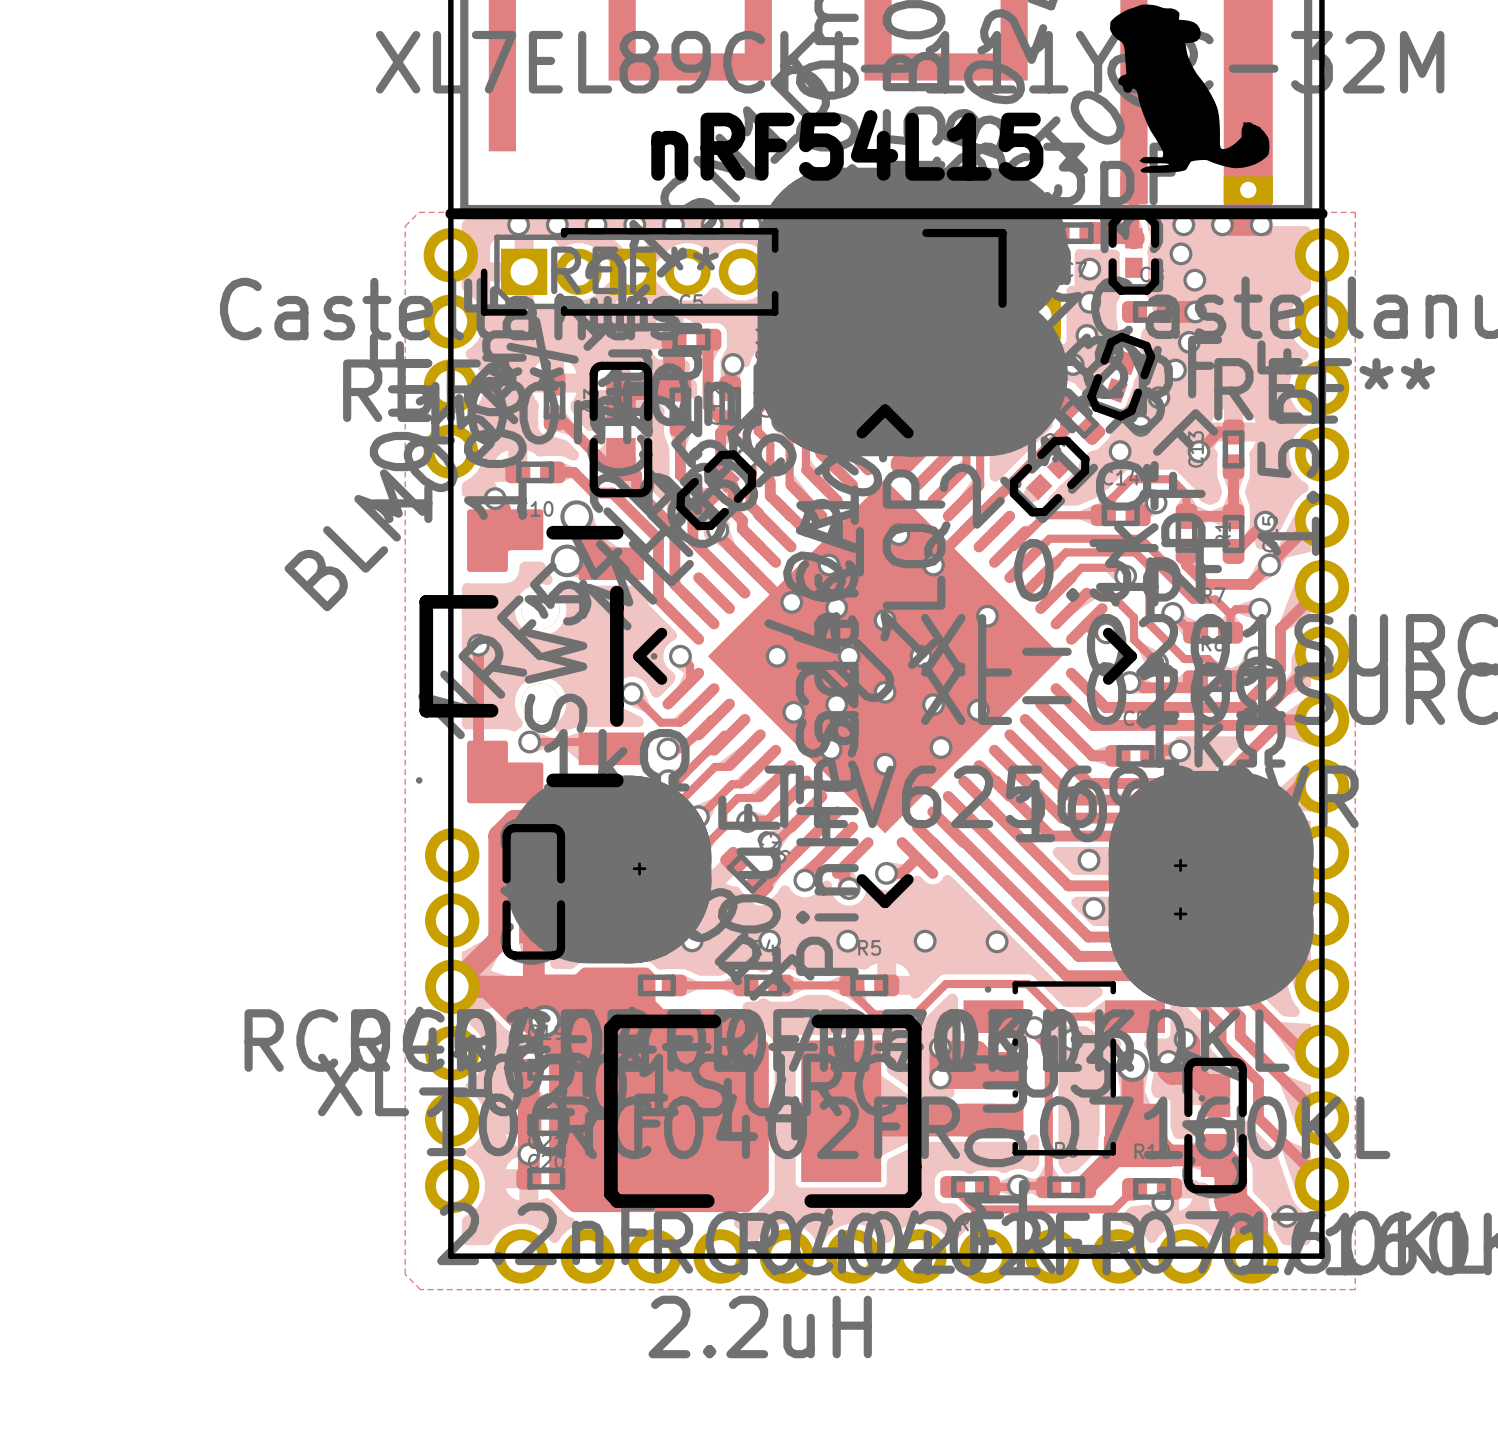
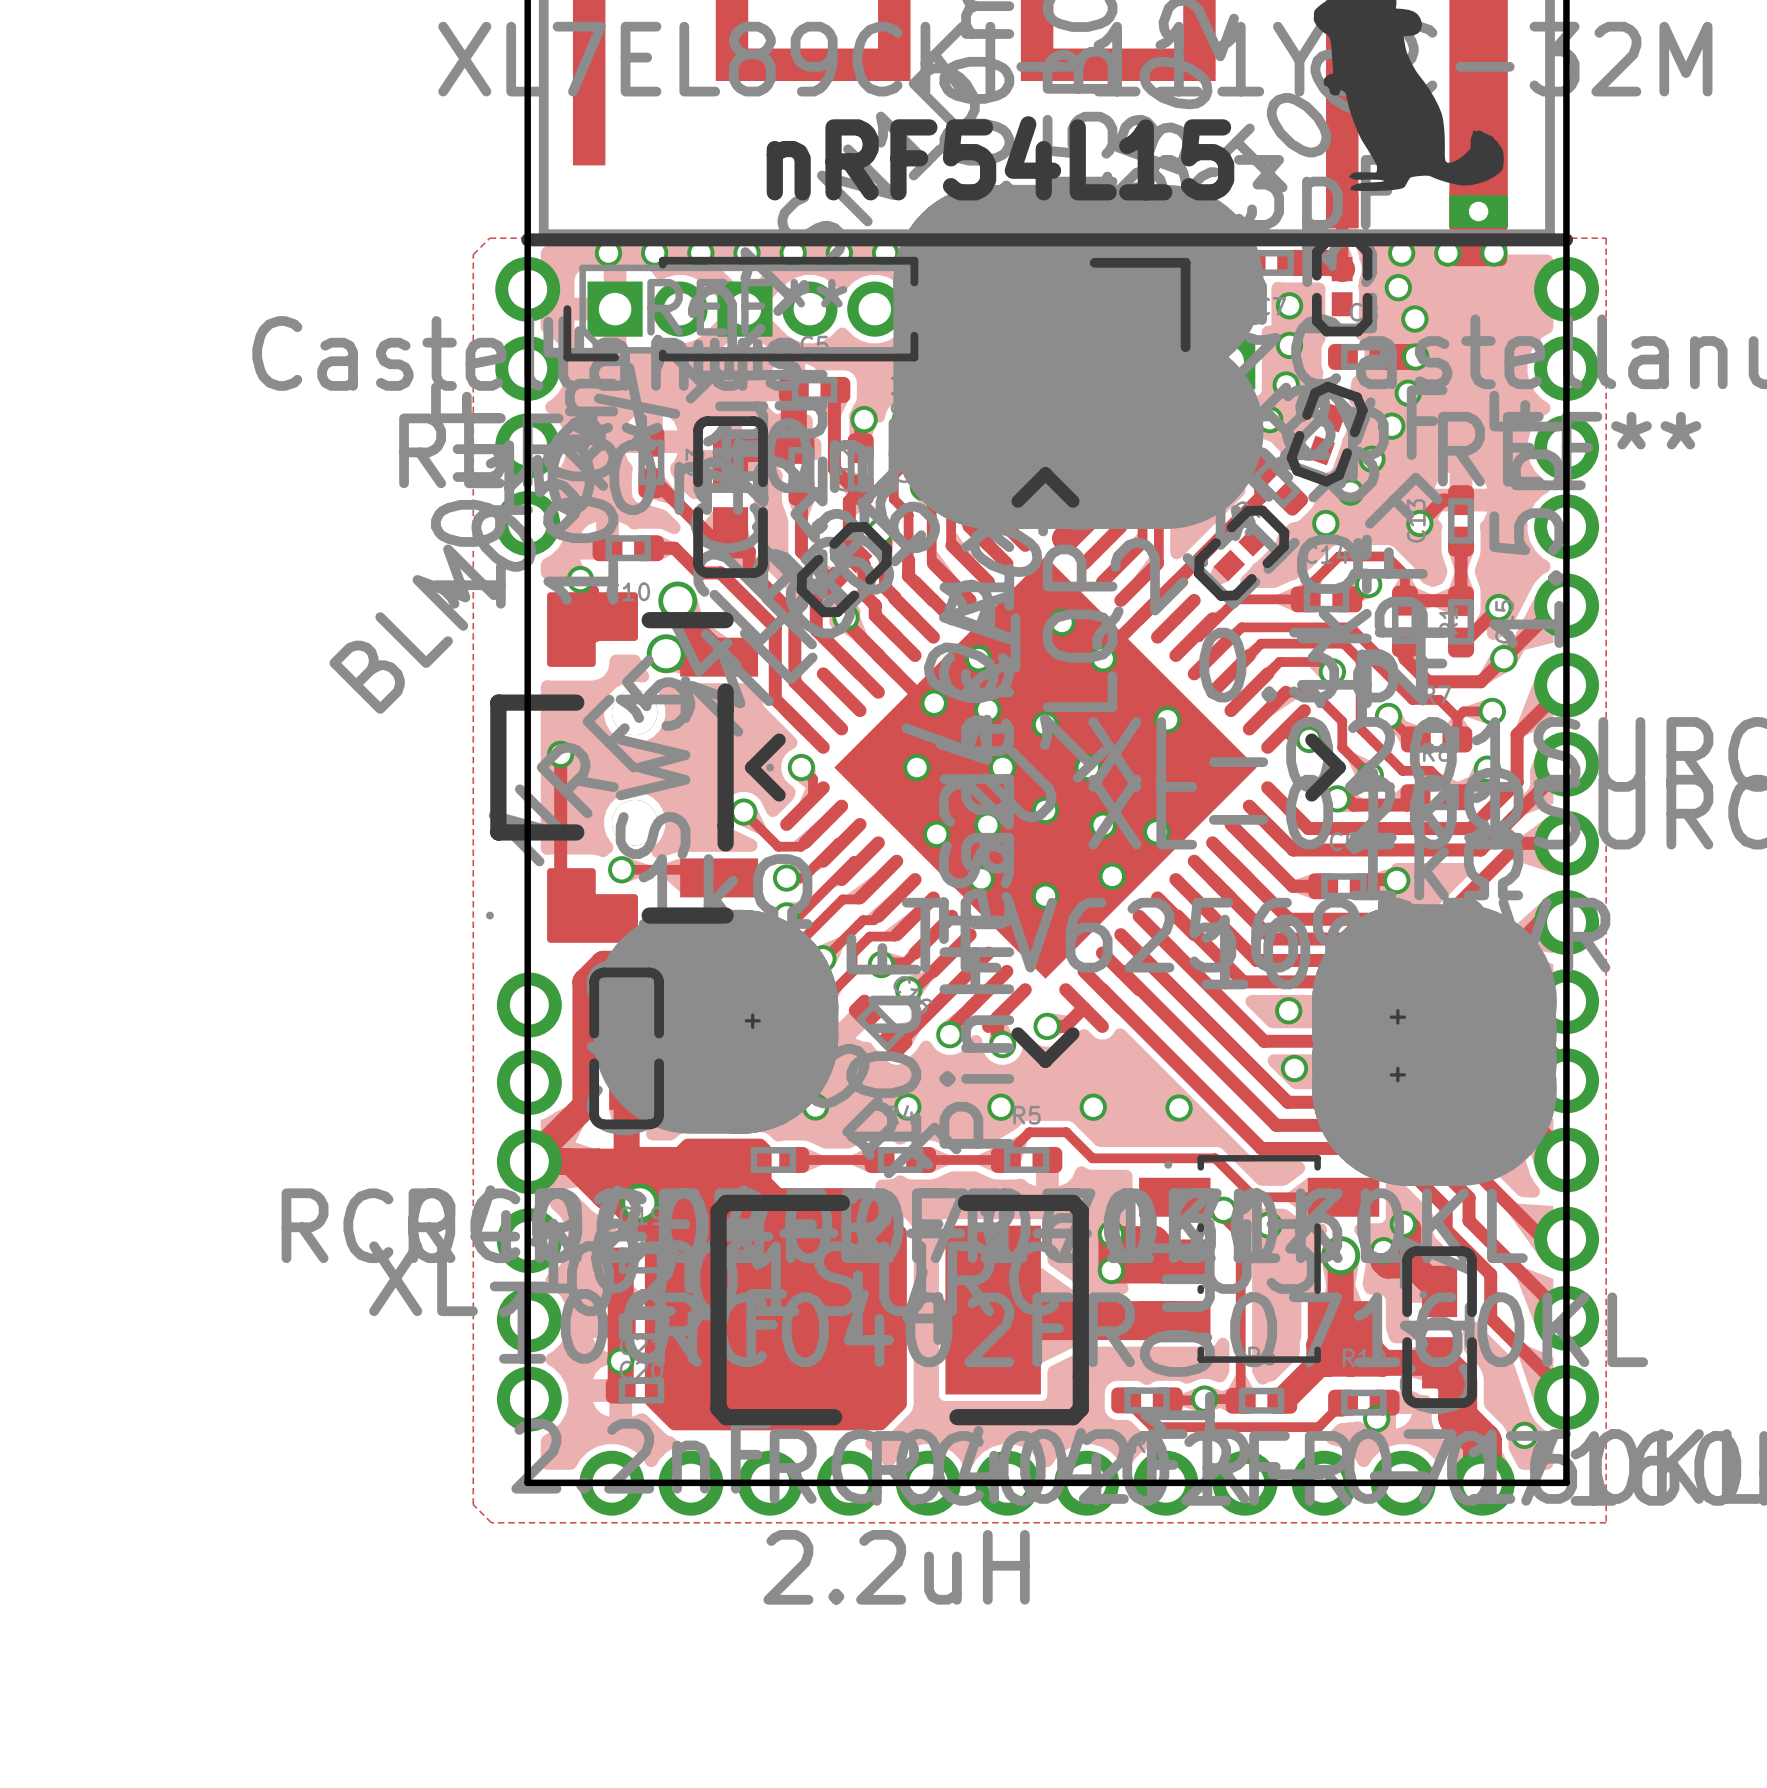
track: (945, 984) (915, 1014) (874, 1014) (851, 992) -> (1118, 1158) (1092, 1158) (1066, 1132) (1029, 1132) (1005, 1155) (1005, 1160)

